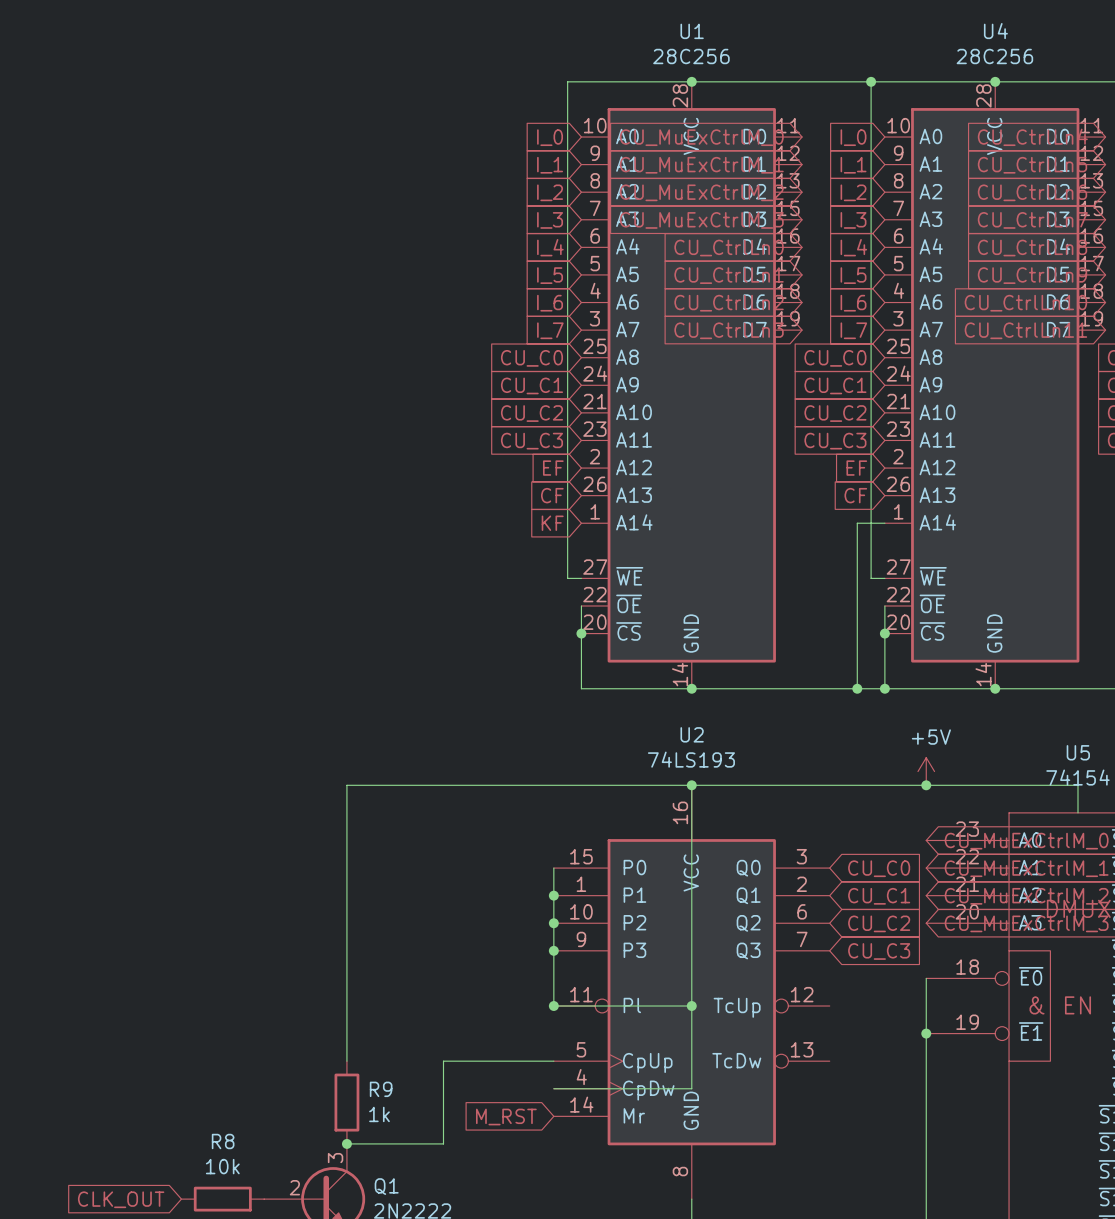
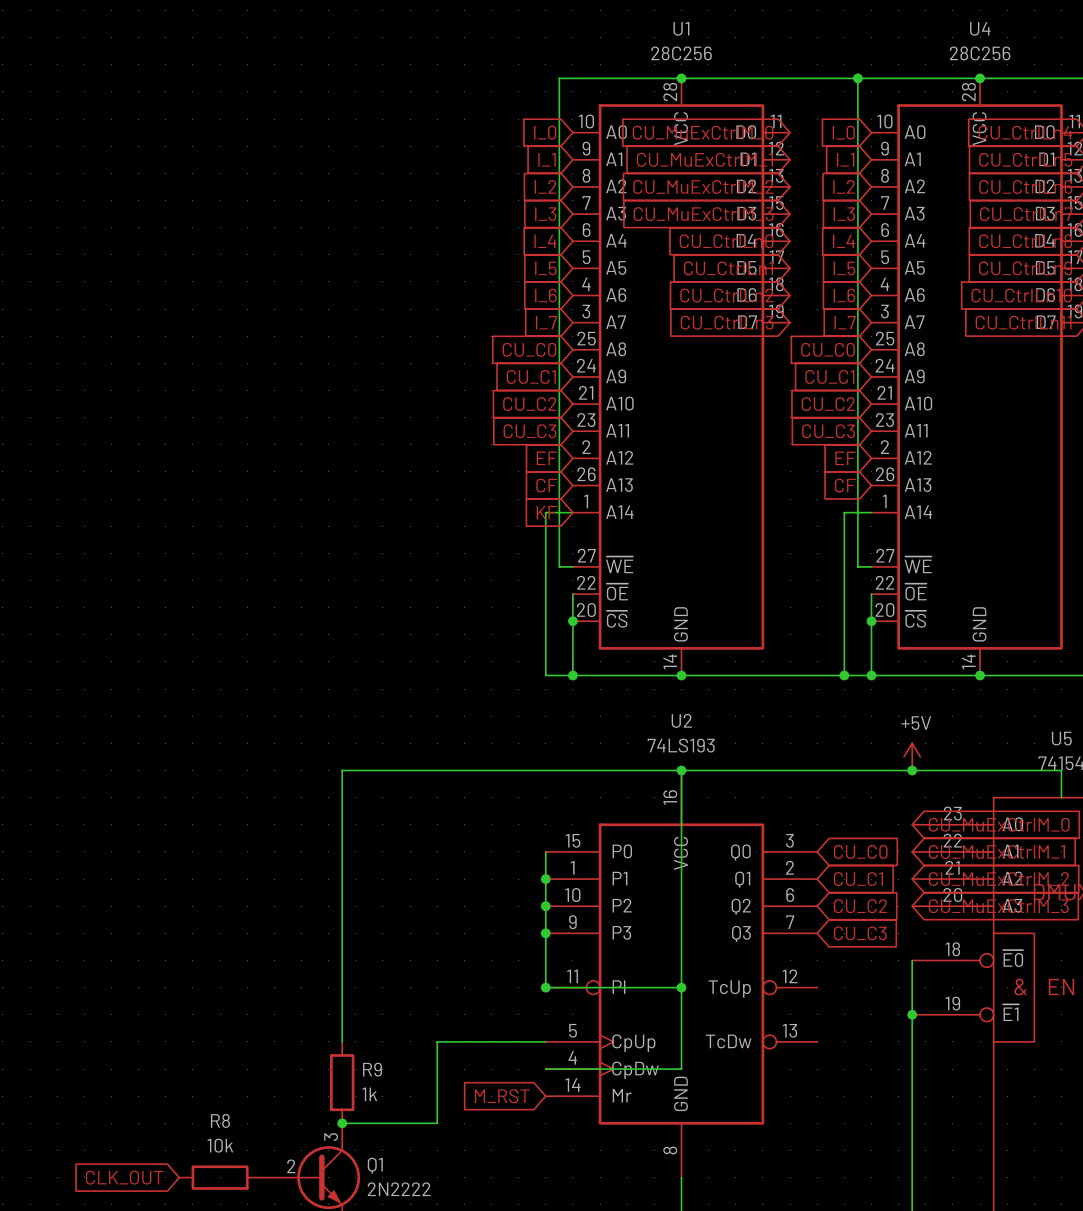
wire: none -> (572, 512) (545, 512) (545, 675) (572, 675)
junction: none -> (572, 675)

